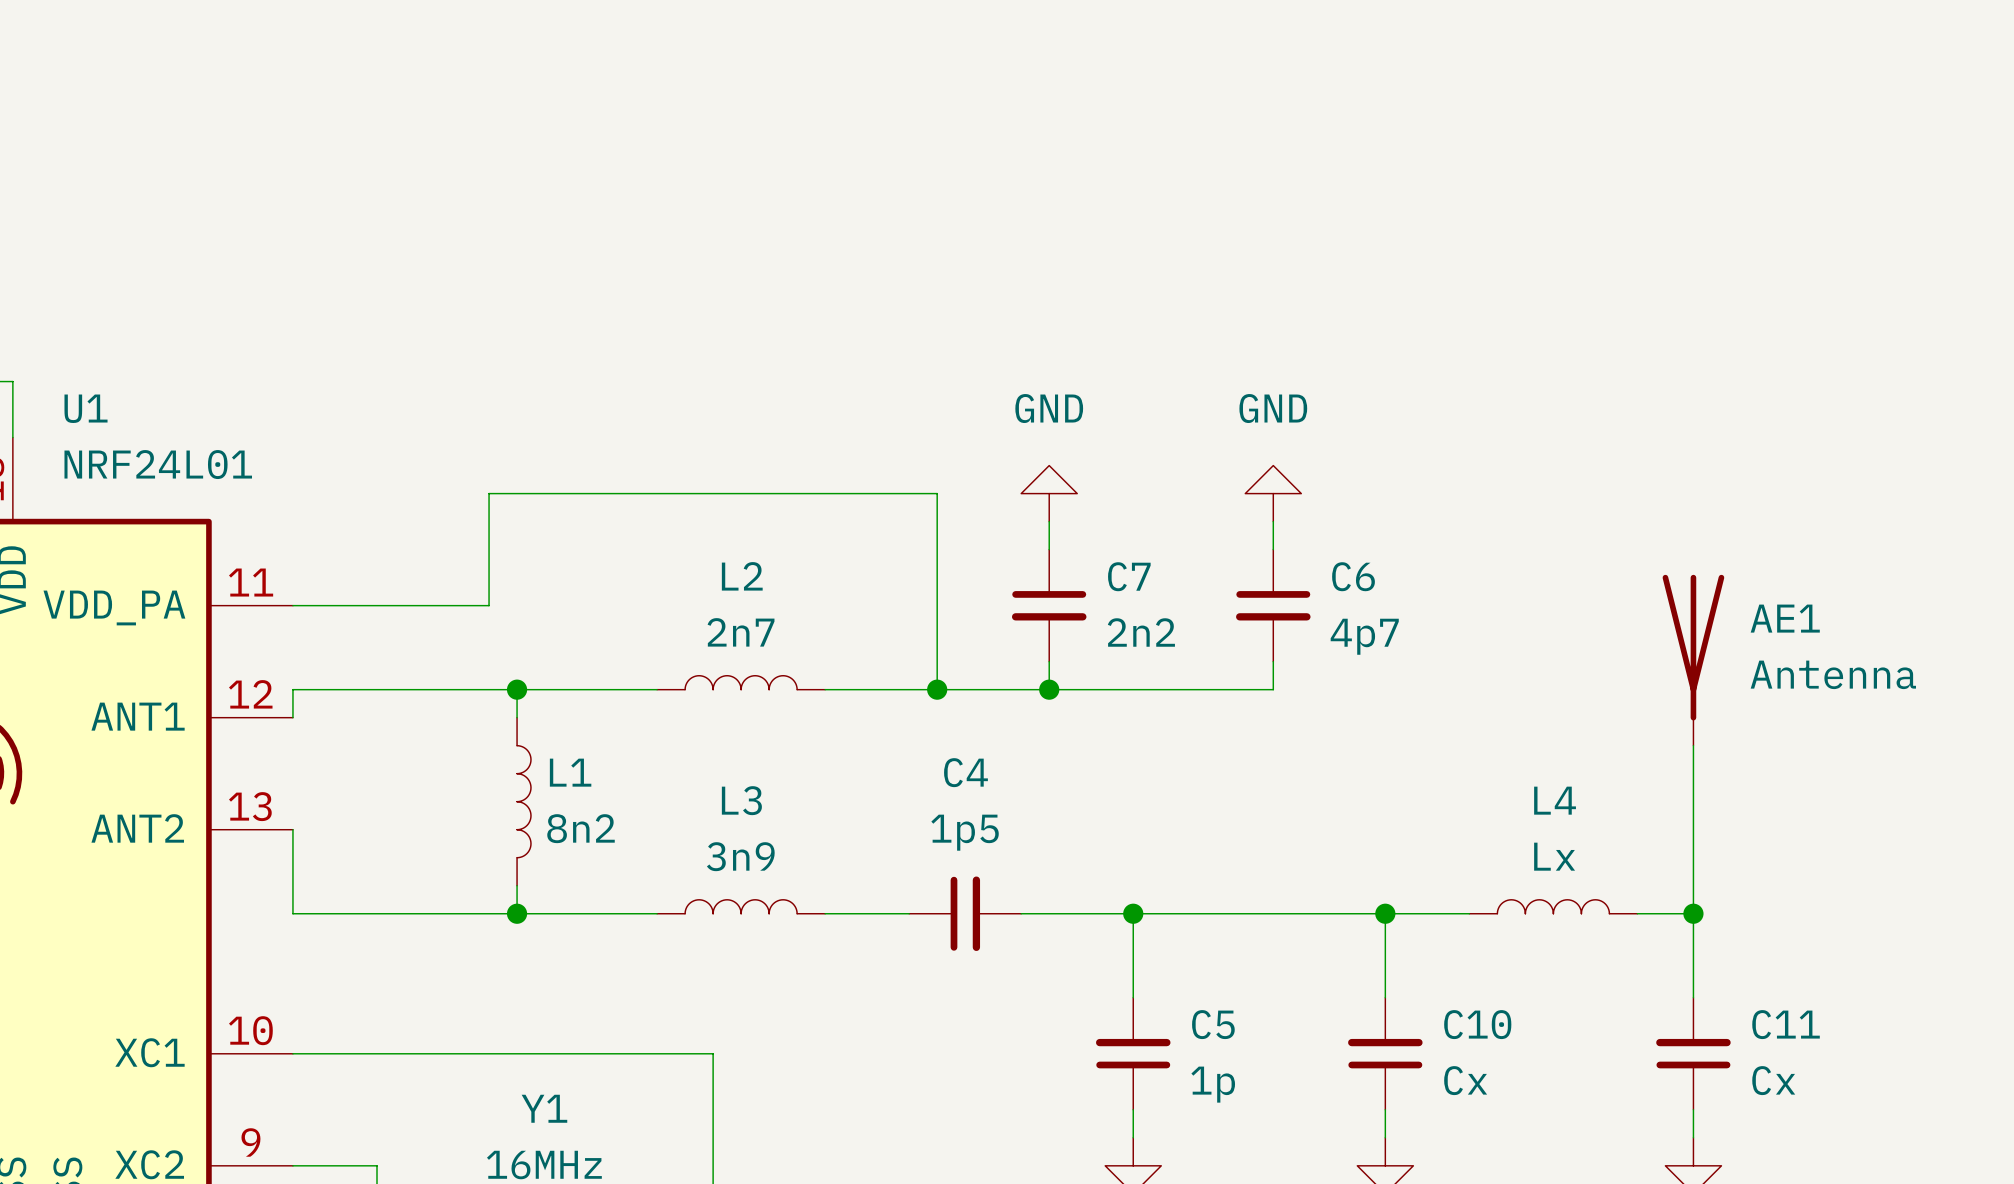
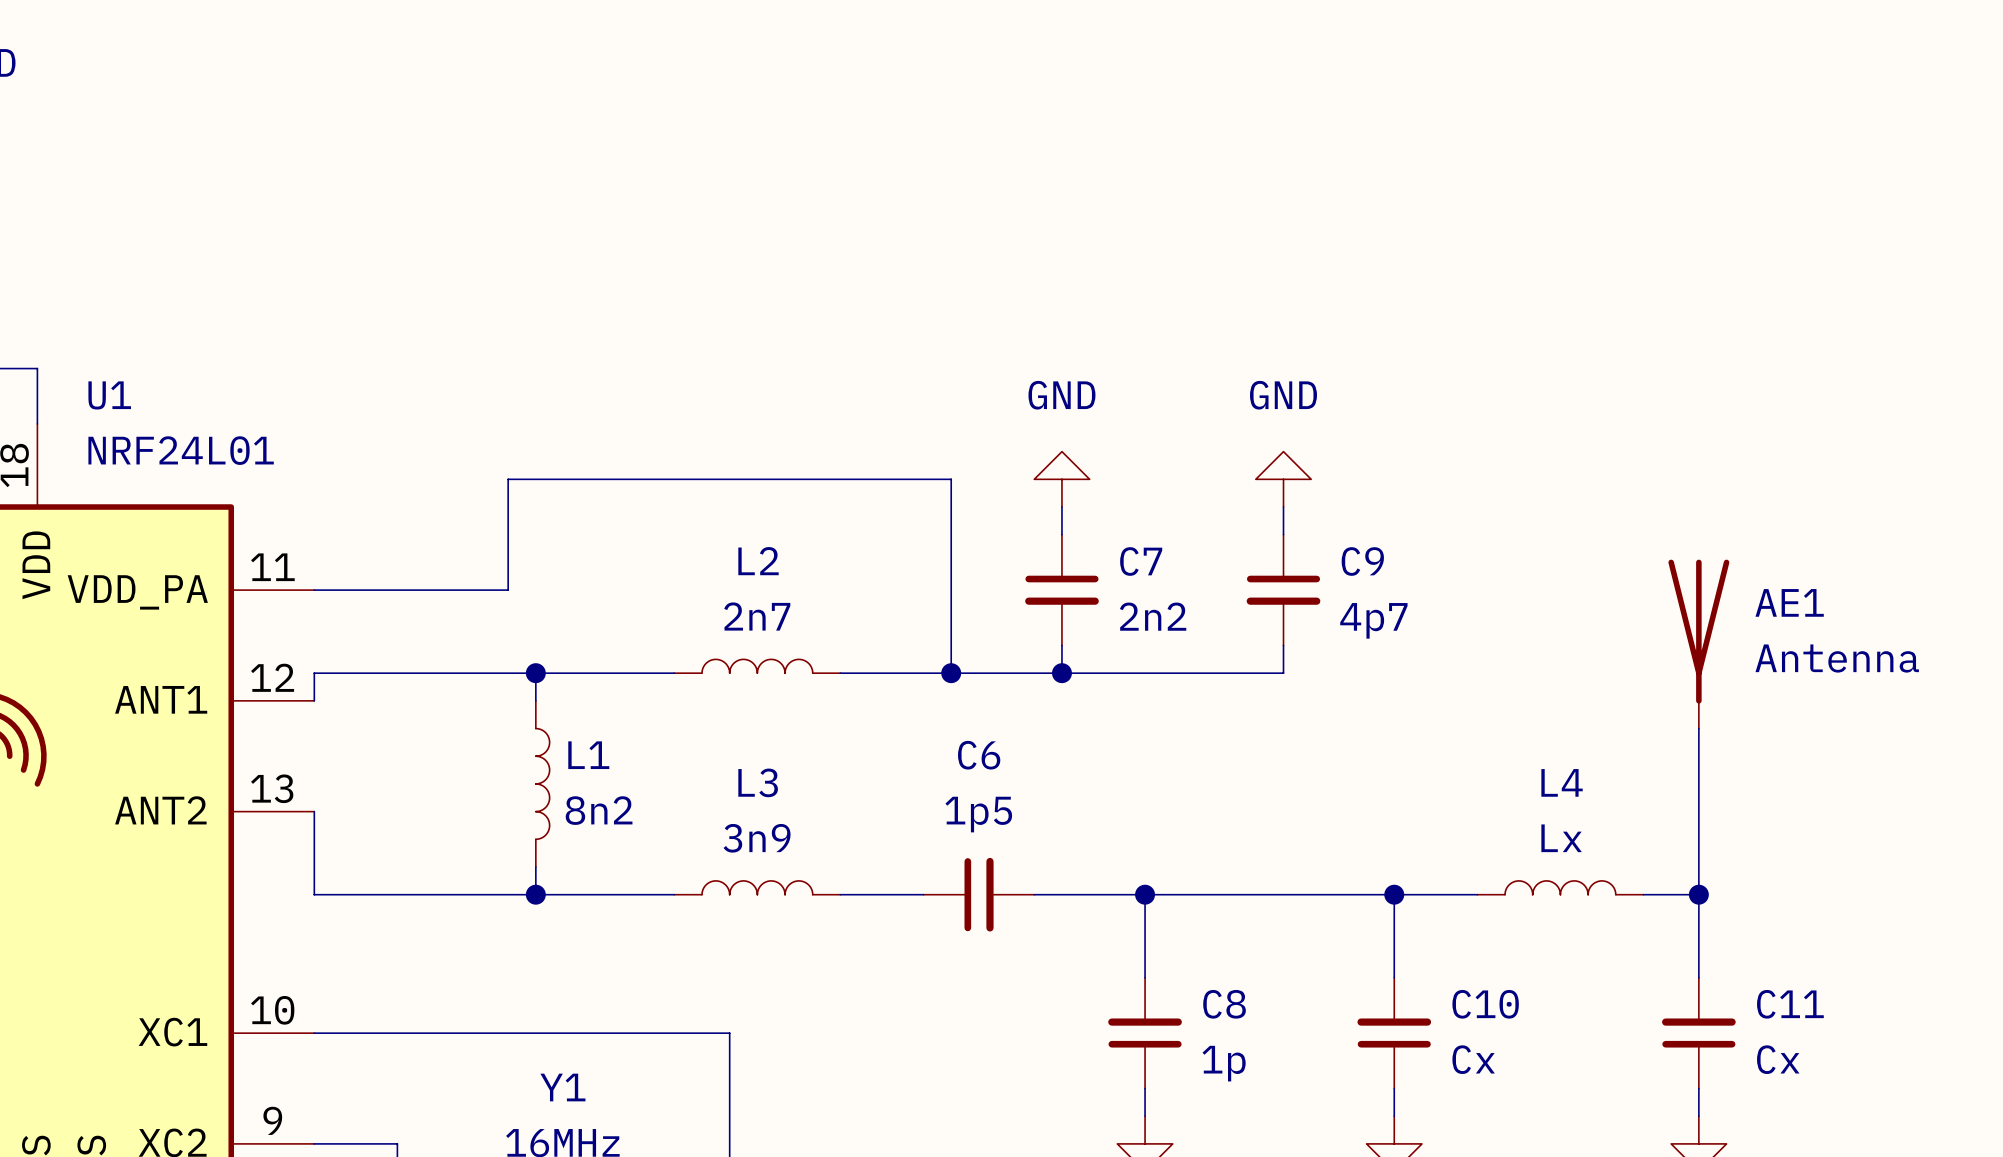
C6 name: C6 (1353, 576) -> C9 (1362, 561)
C4 name: C4 (965, 772) -> C6 (979, 755)
C5 name: C5 (1213, 1024) -> C8 (1224, 1004)

